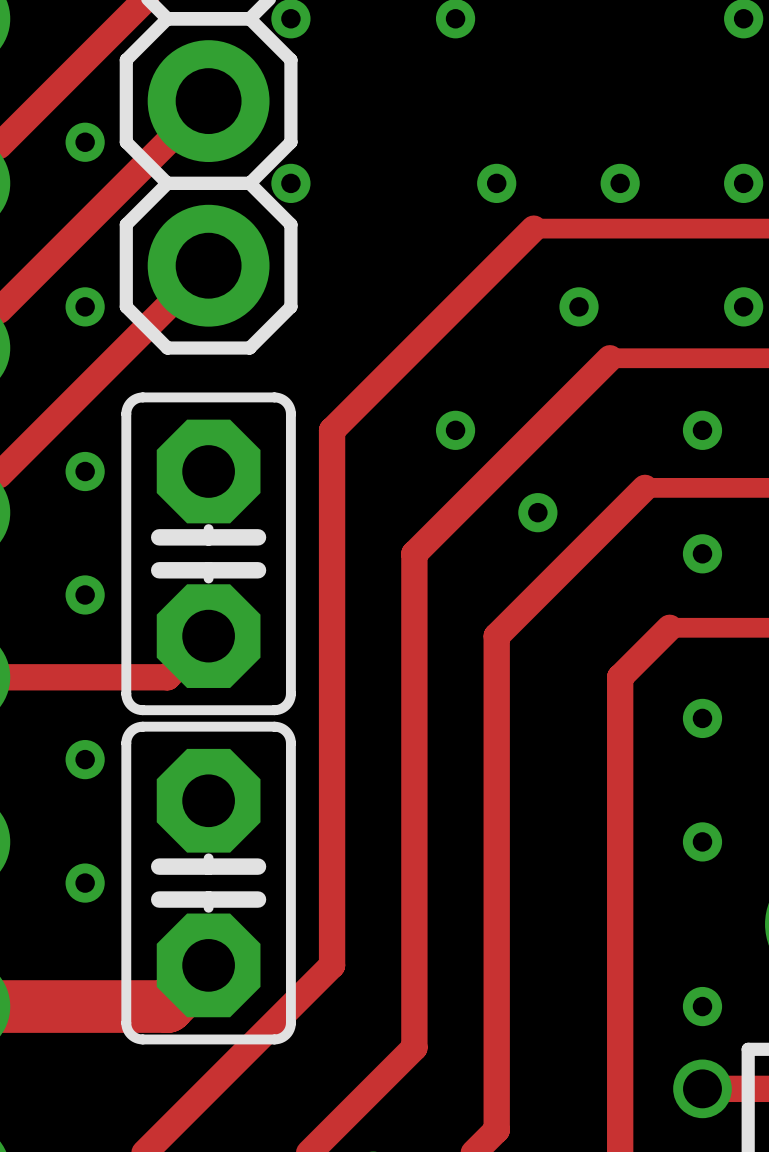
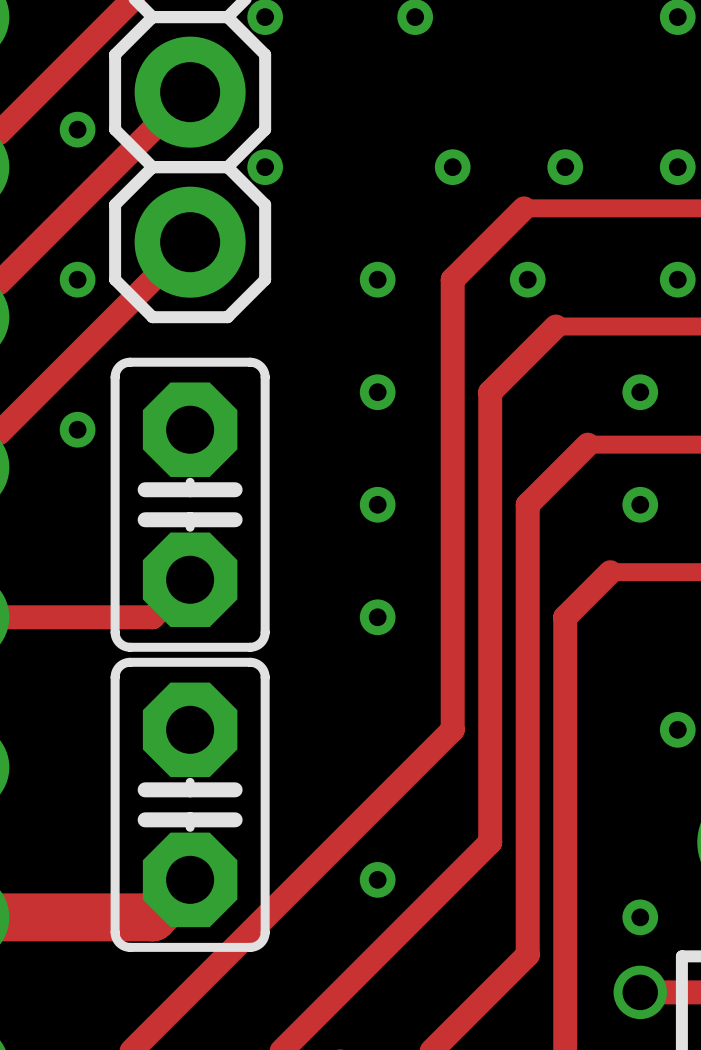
track: (574, 228) (533, 228) (332, 430) (332, 965) -> none
via: none -> (377, 279)
via position: (455, 430) -> (377, 392)
track: (537, 430) (414, 553) (414, 1047) -> (490, 392) (490, 842) (377, 954)
via: (537, 512) -> none
via: none -> (377, 504)
track: (579, 553) (496, 636) -> (524, 208) (452, 279) (452, 579)
track: none -> (527, 504) (527, 954) (452, 1029)
via: (85, 594) -> none
via: none -> (377, 617)
via: (702, 718) -> none
via: (85, 759) -> none
track: (496, 800) (496, 1130) -> (452, 729) (302, 879)
via: none -> (677, 729)
via: (702, 841) -> none
via: (85, 883) -> none
via: none -> (377, 879)

